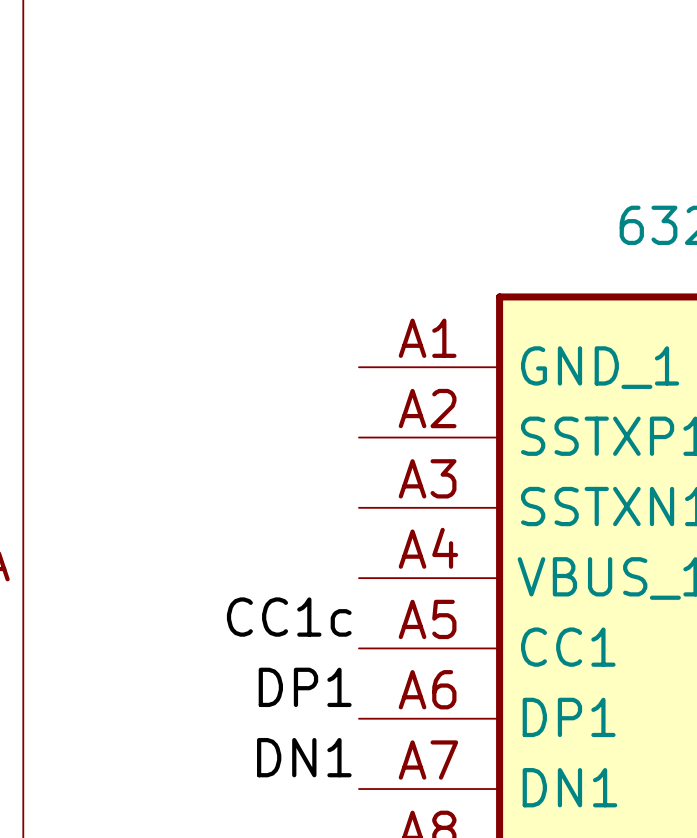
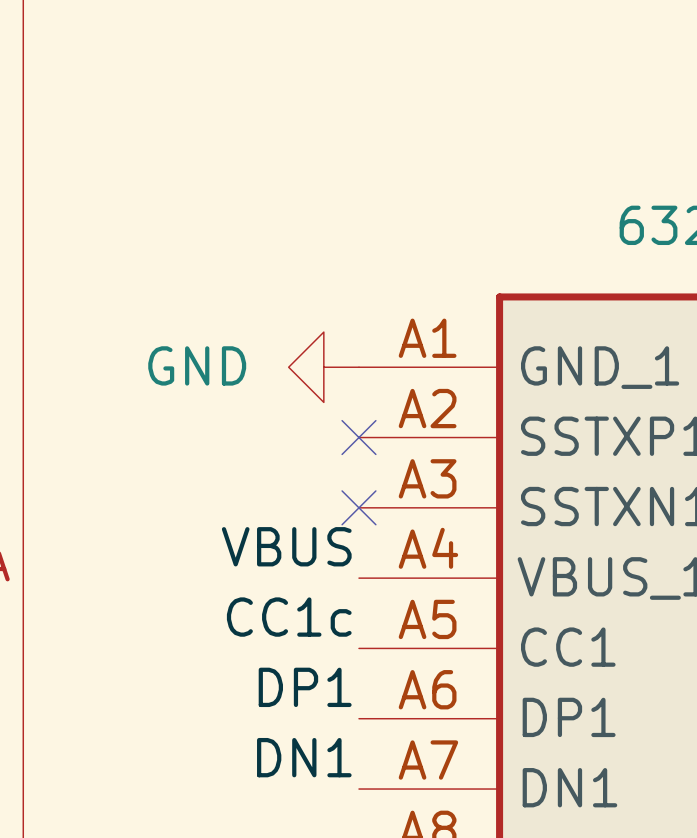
power symbol: none -> GND (323, 367)
no-connect mark: none -> (358, 437)
no-connect mark: none -> (358, 507)
label: none -> VBUS (286, 546)

